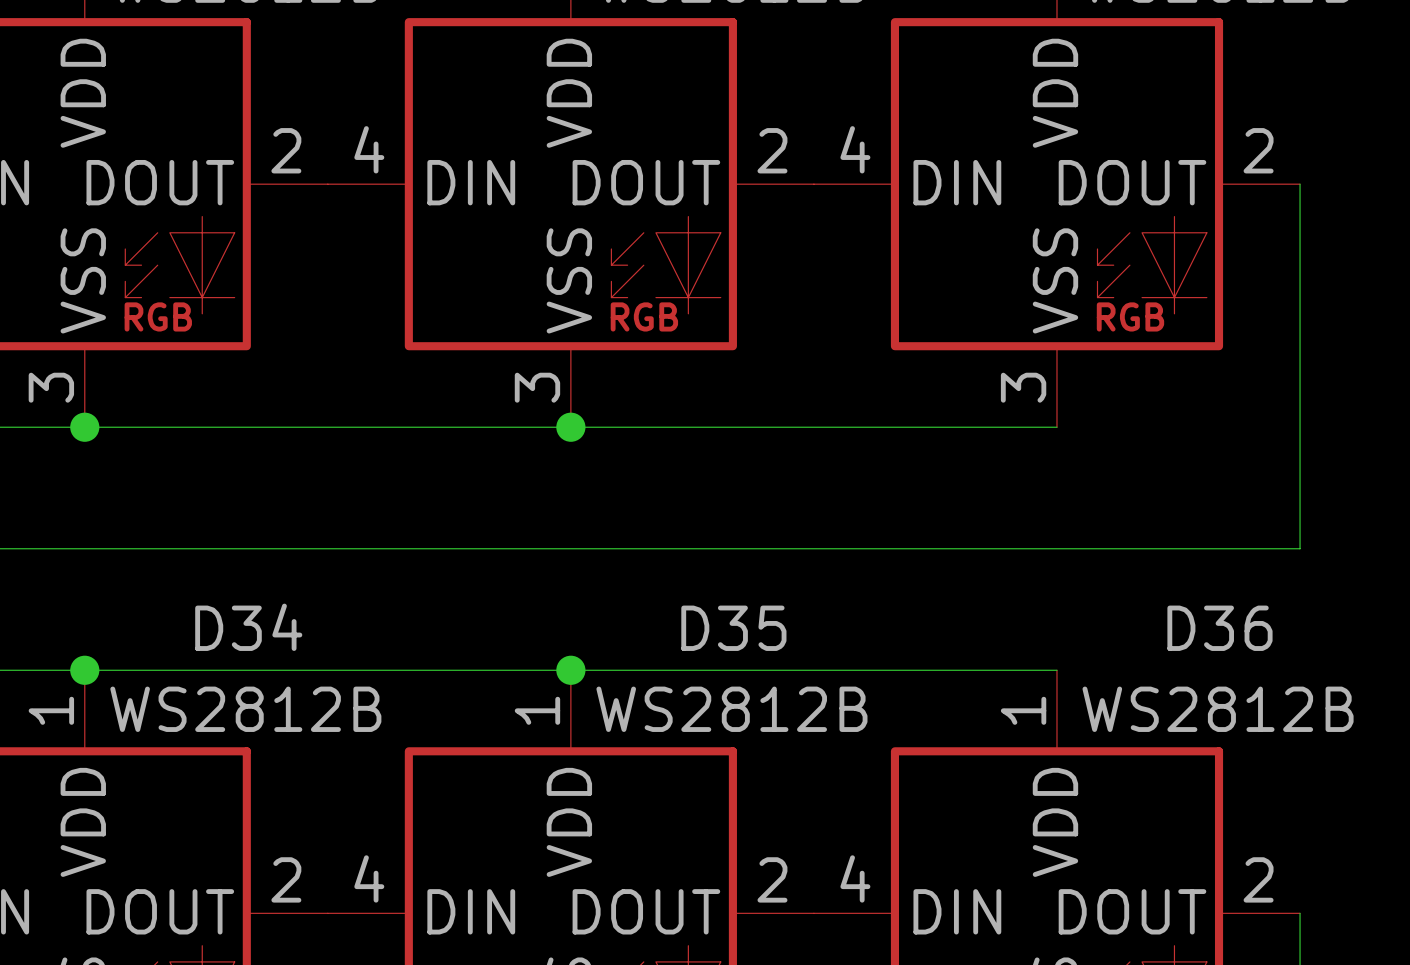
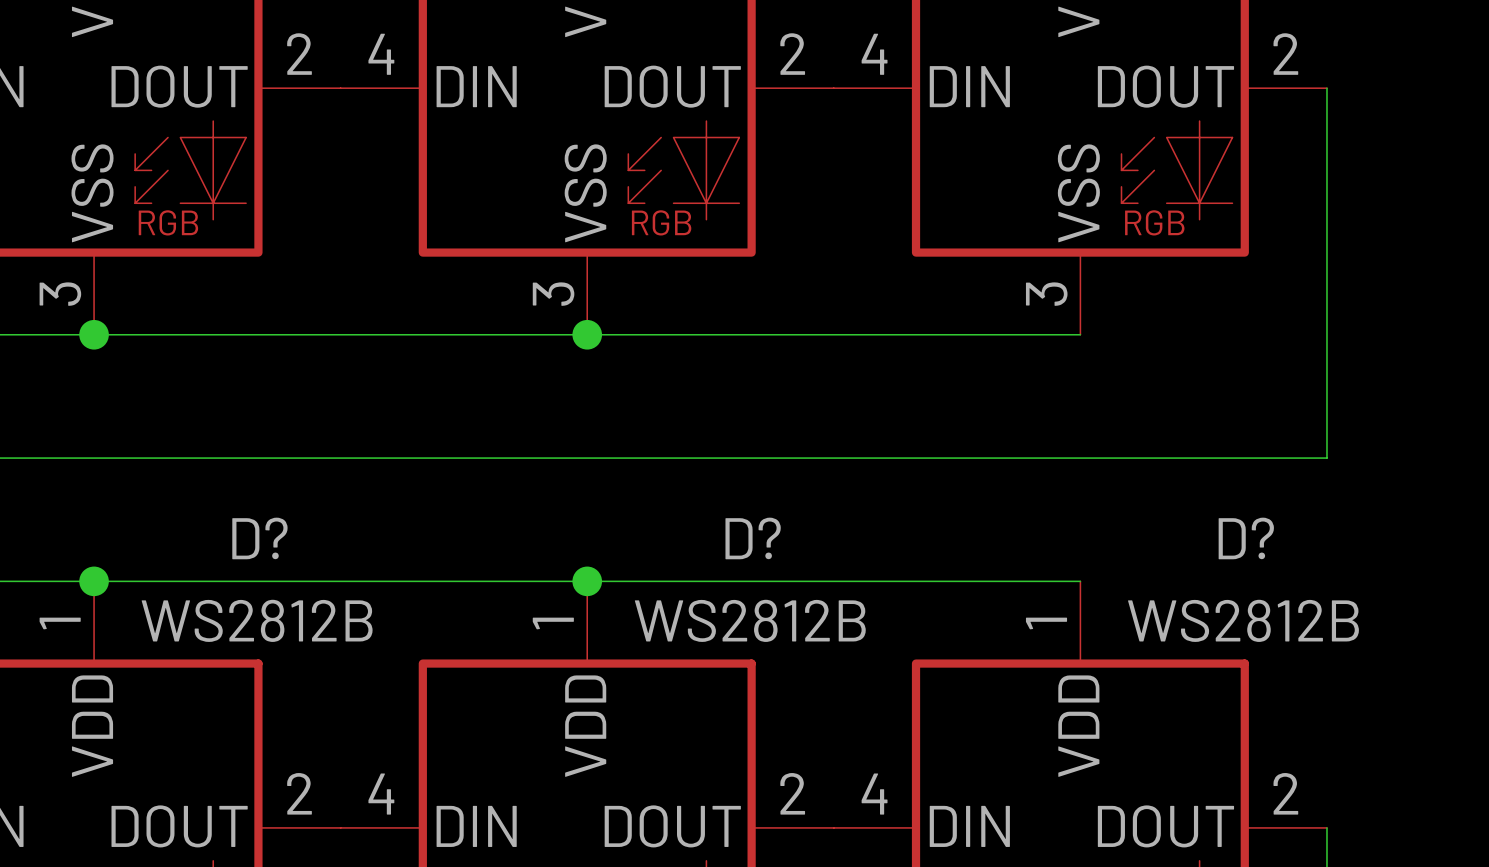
D34 name: D34 (248, 627) -> D? (259, 538)
D35 name: D35 (733, 628) -> D? (753, 538)
D36 name: D36 (1219, 628) -> D? (1246, 538)

